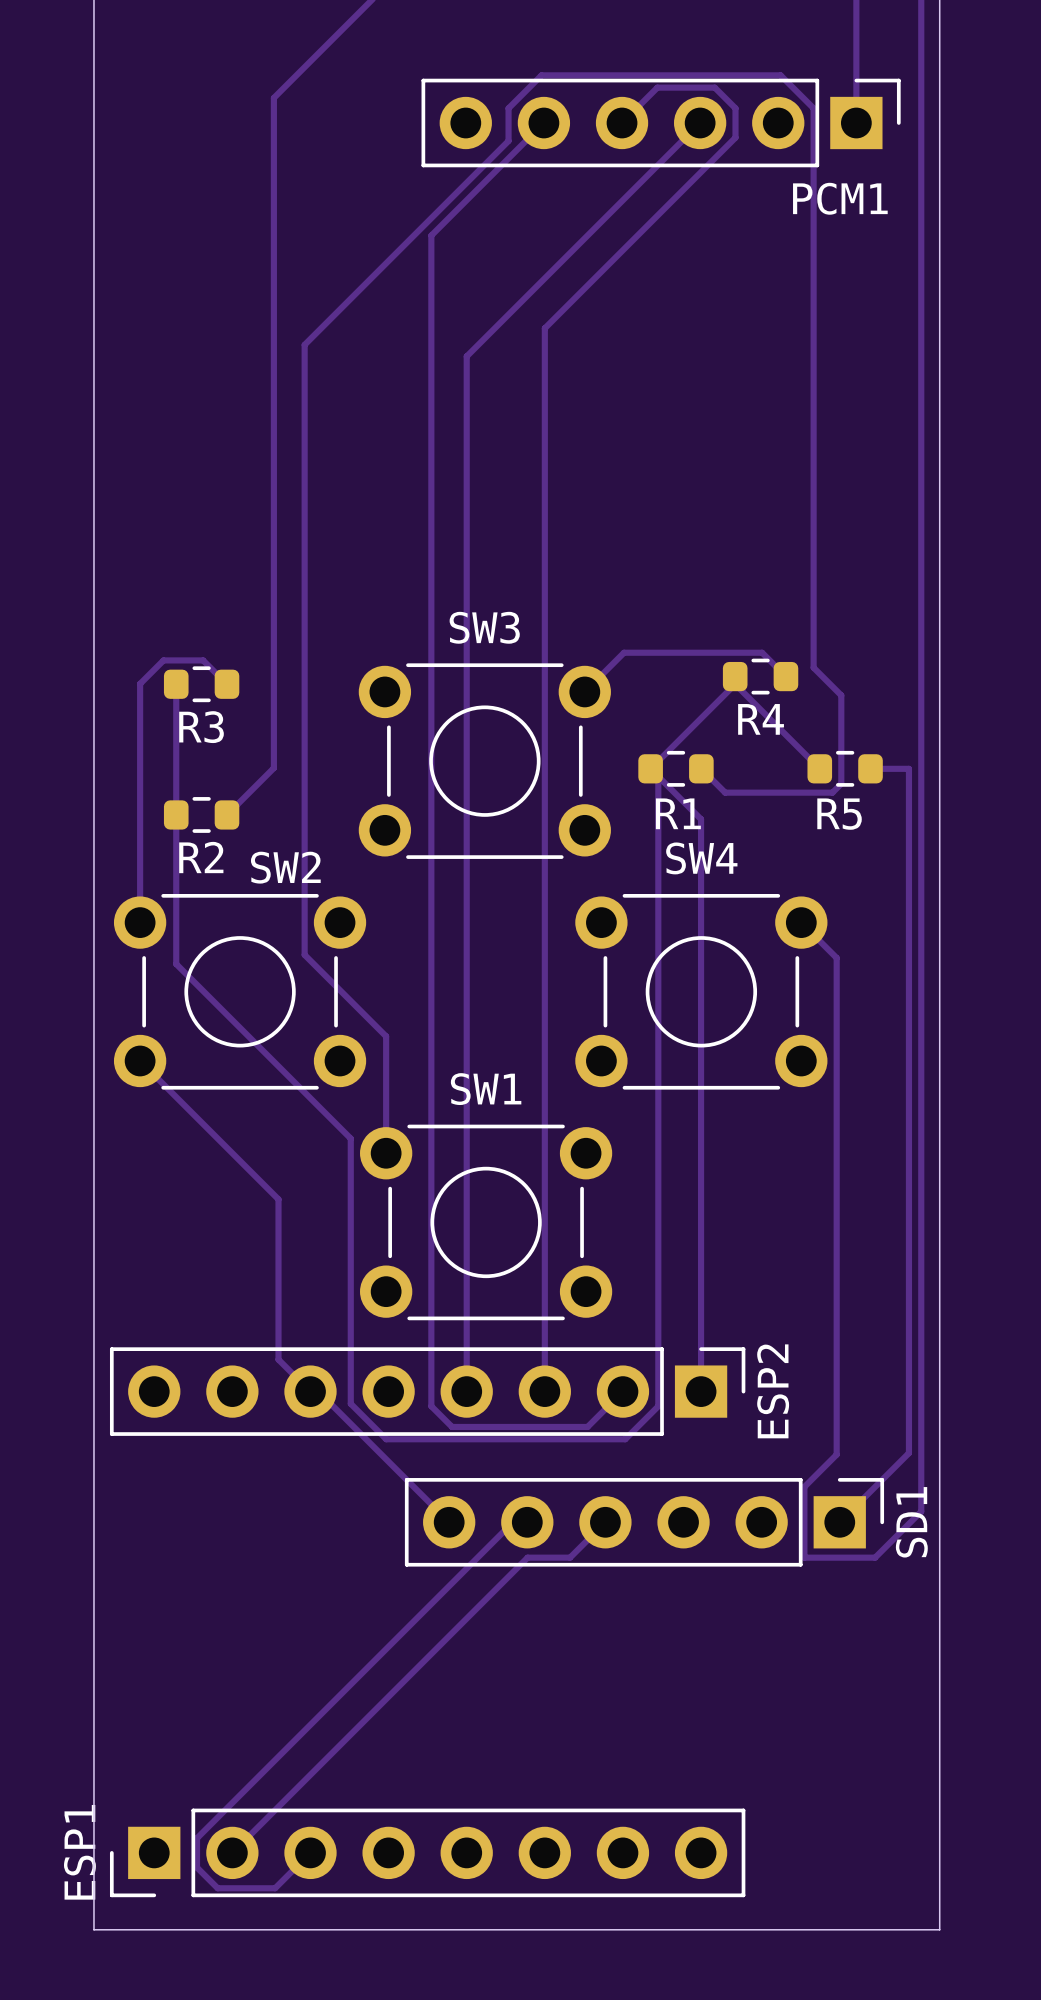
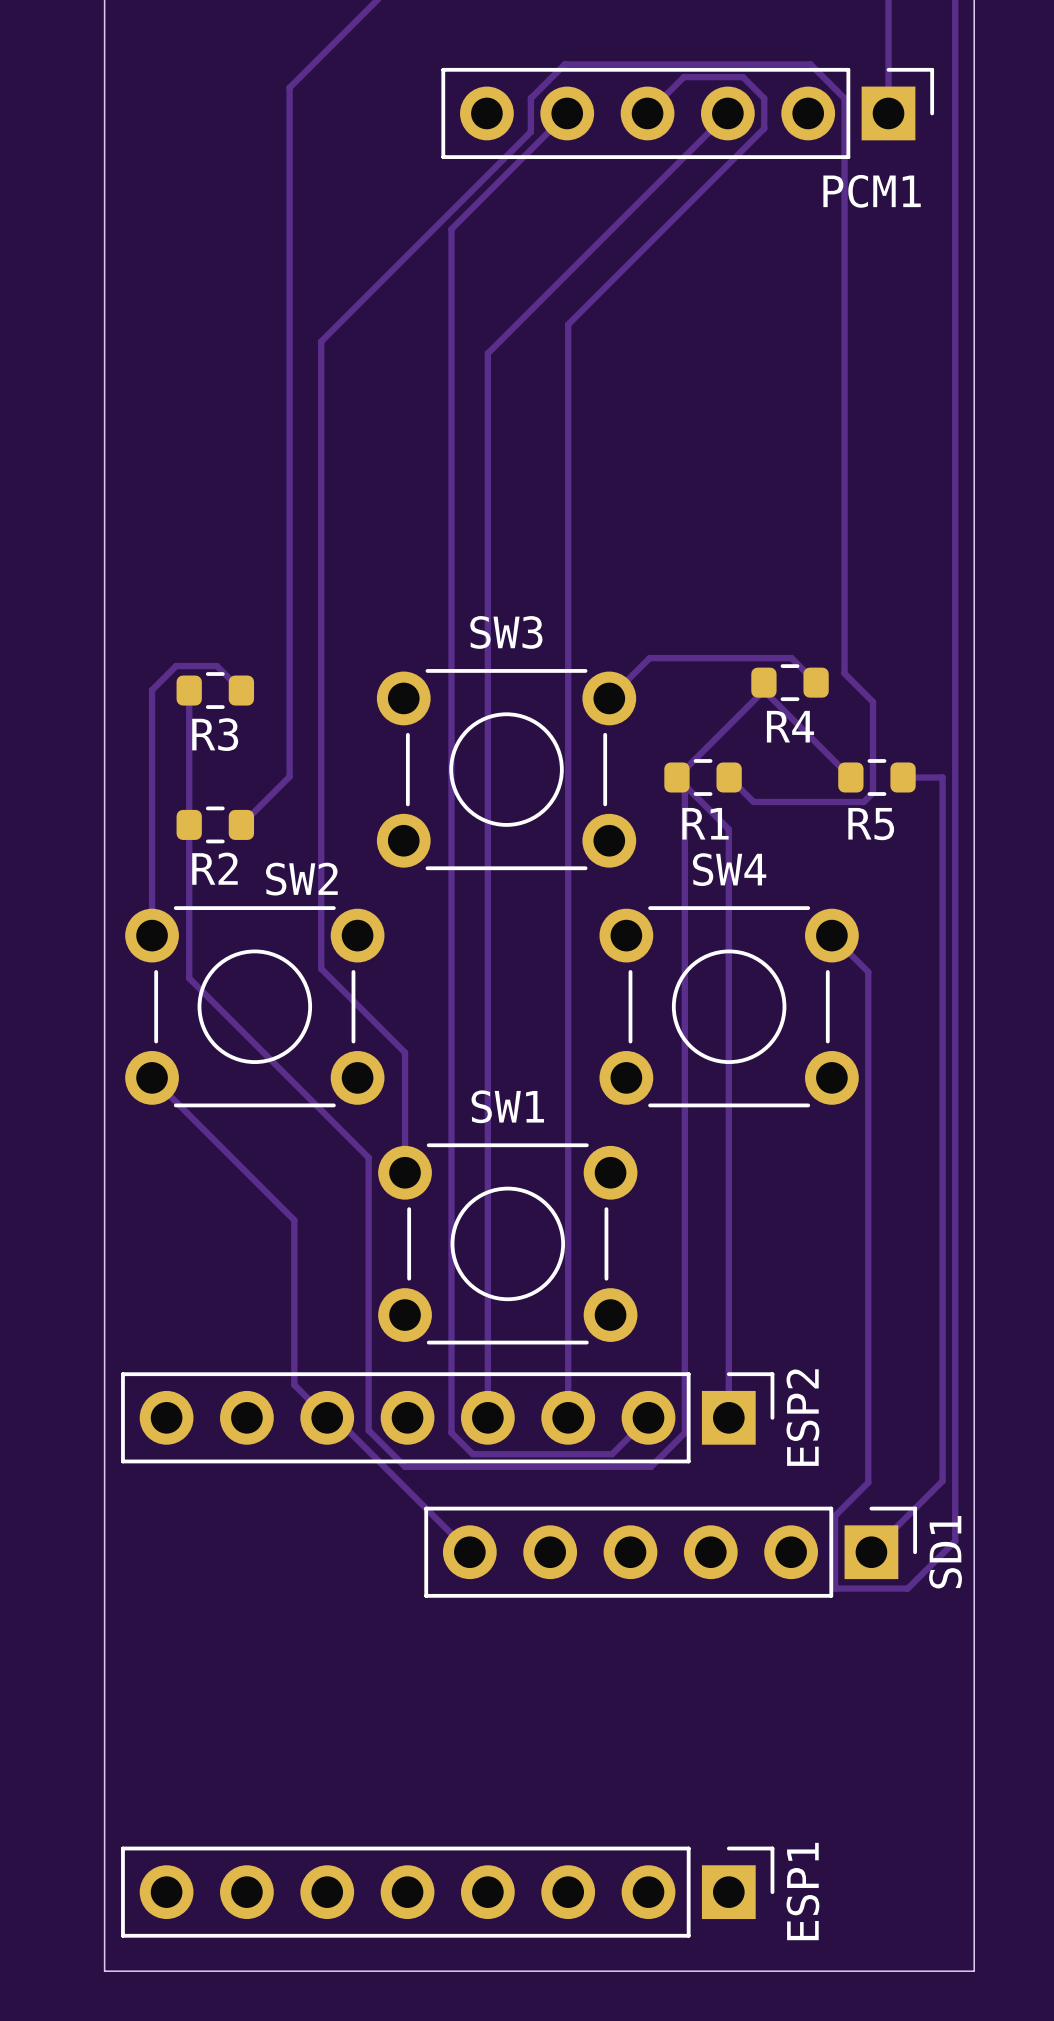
track: (527, 1522) (512, 1522) (197, 1838) (197, 1867) (217, 1888) (275, 1888) (310, 1852) -> none
track: (605, 1522) (570, 1557) (527, 1557) (232, 1852) -> none
ESP1 rotation: 0° (427, 1852) -> 180° (447, 1892)

